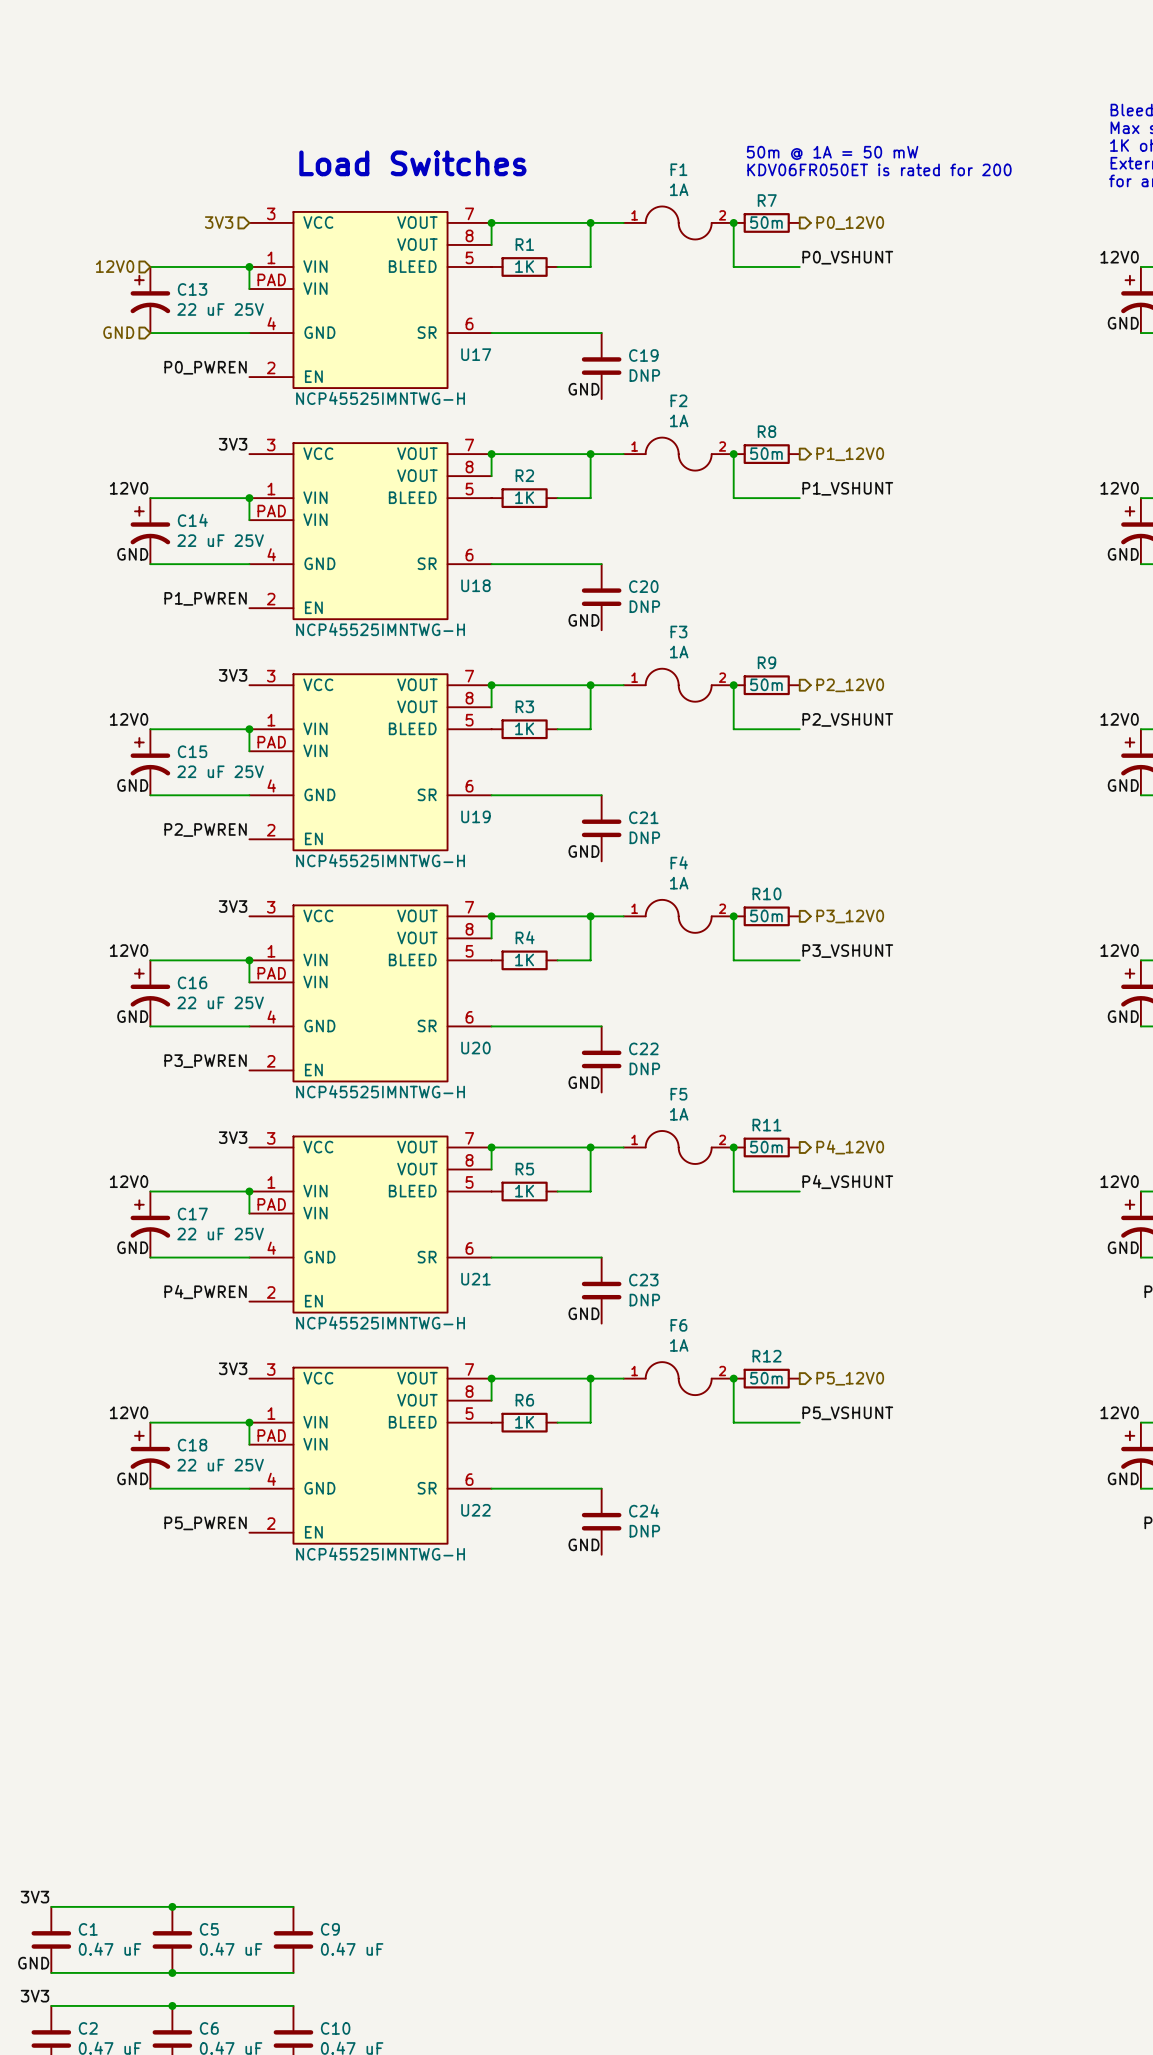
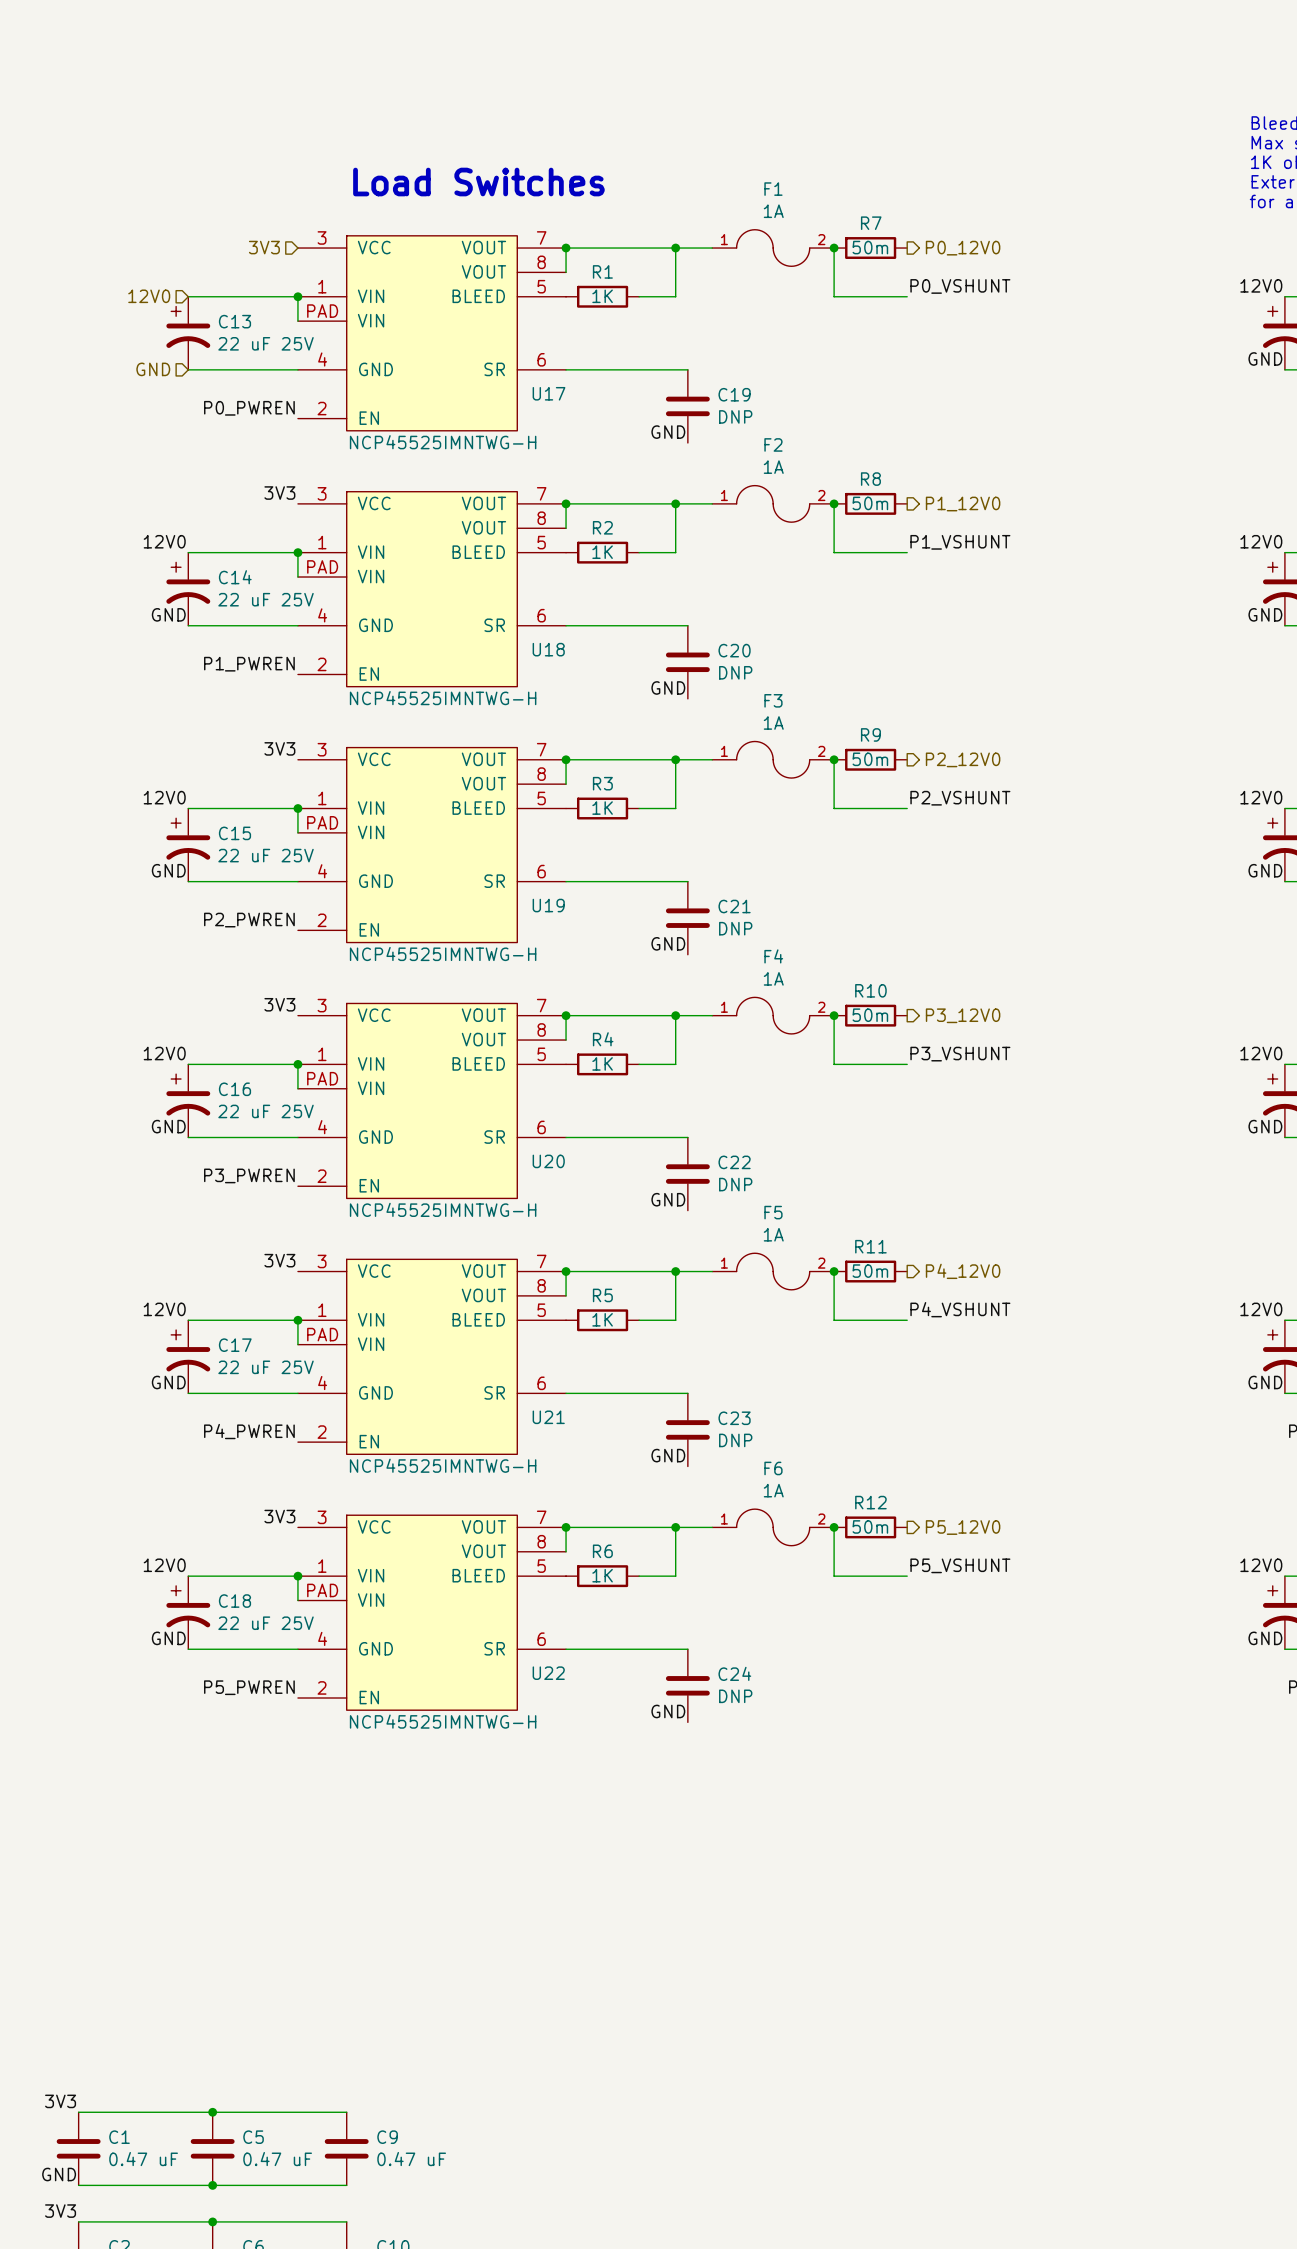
text: 50m @ 1A = 50 mW (832, 152) -> none
text: KDV06FR050ET is rated for 200 (879, 169) -> none

